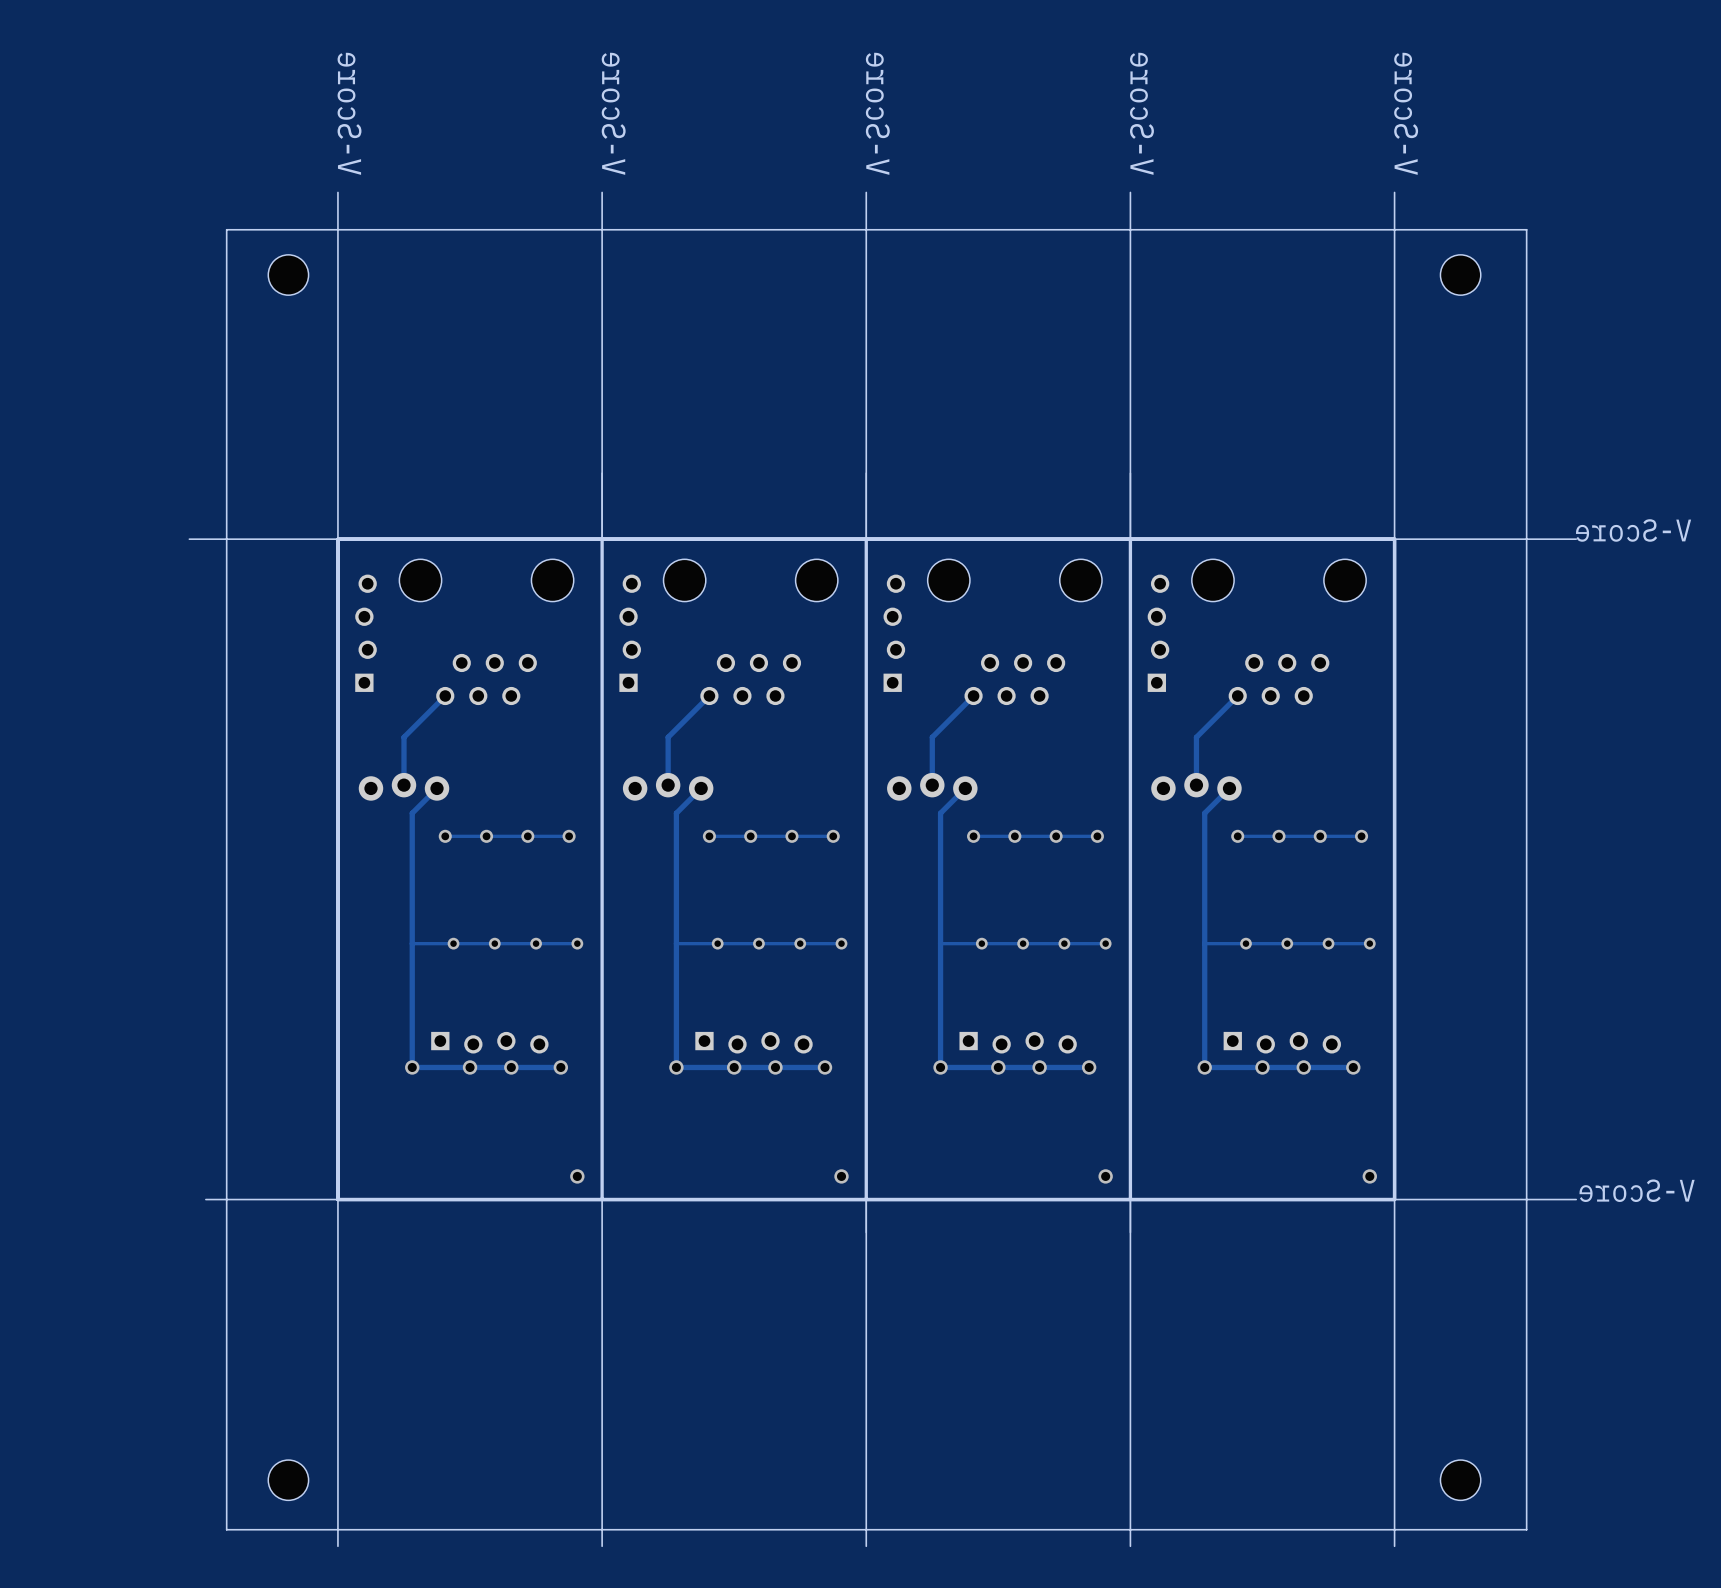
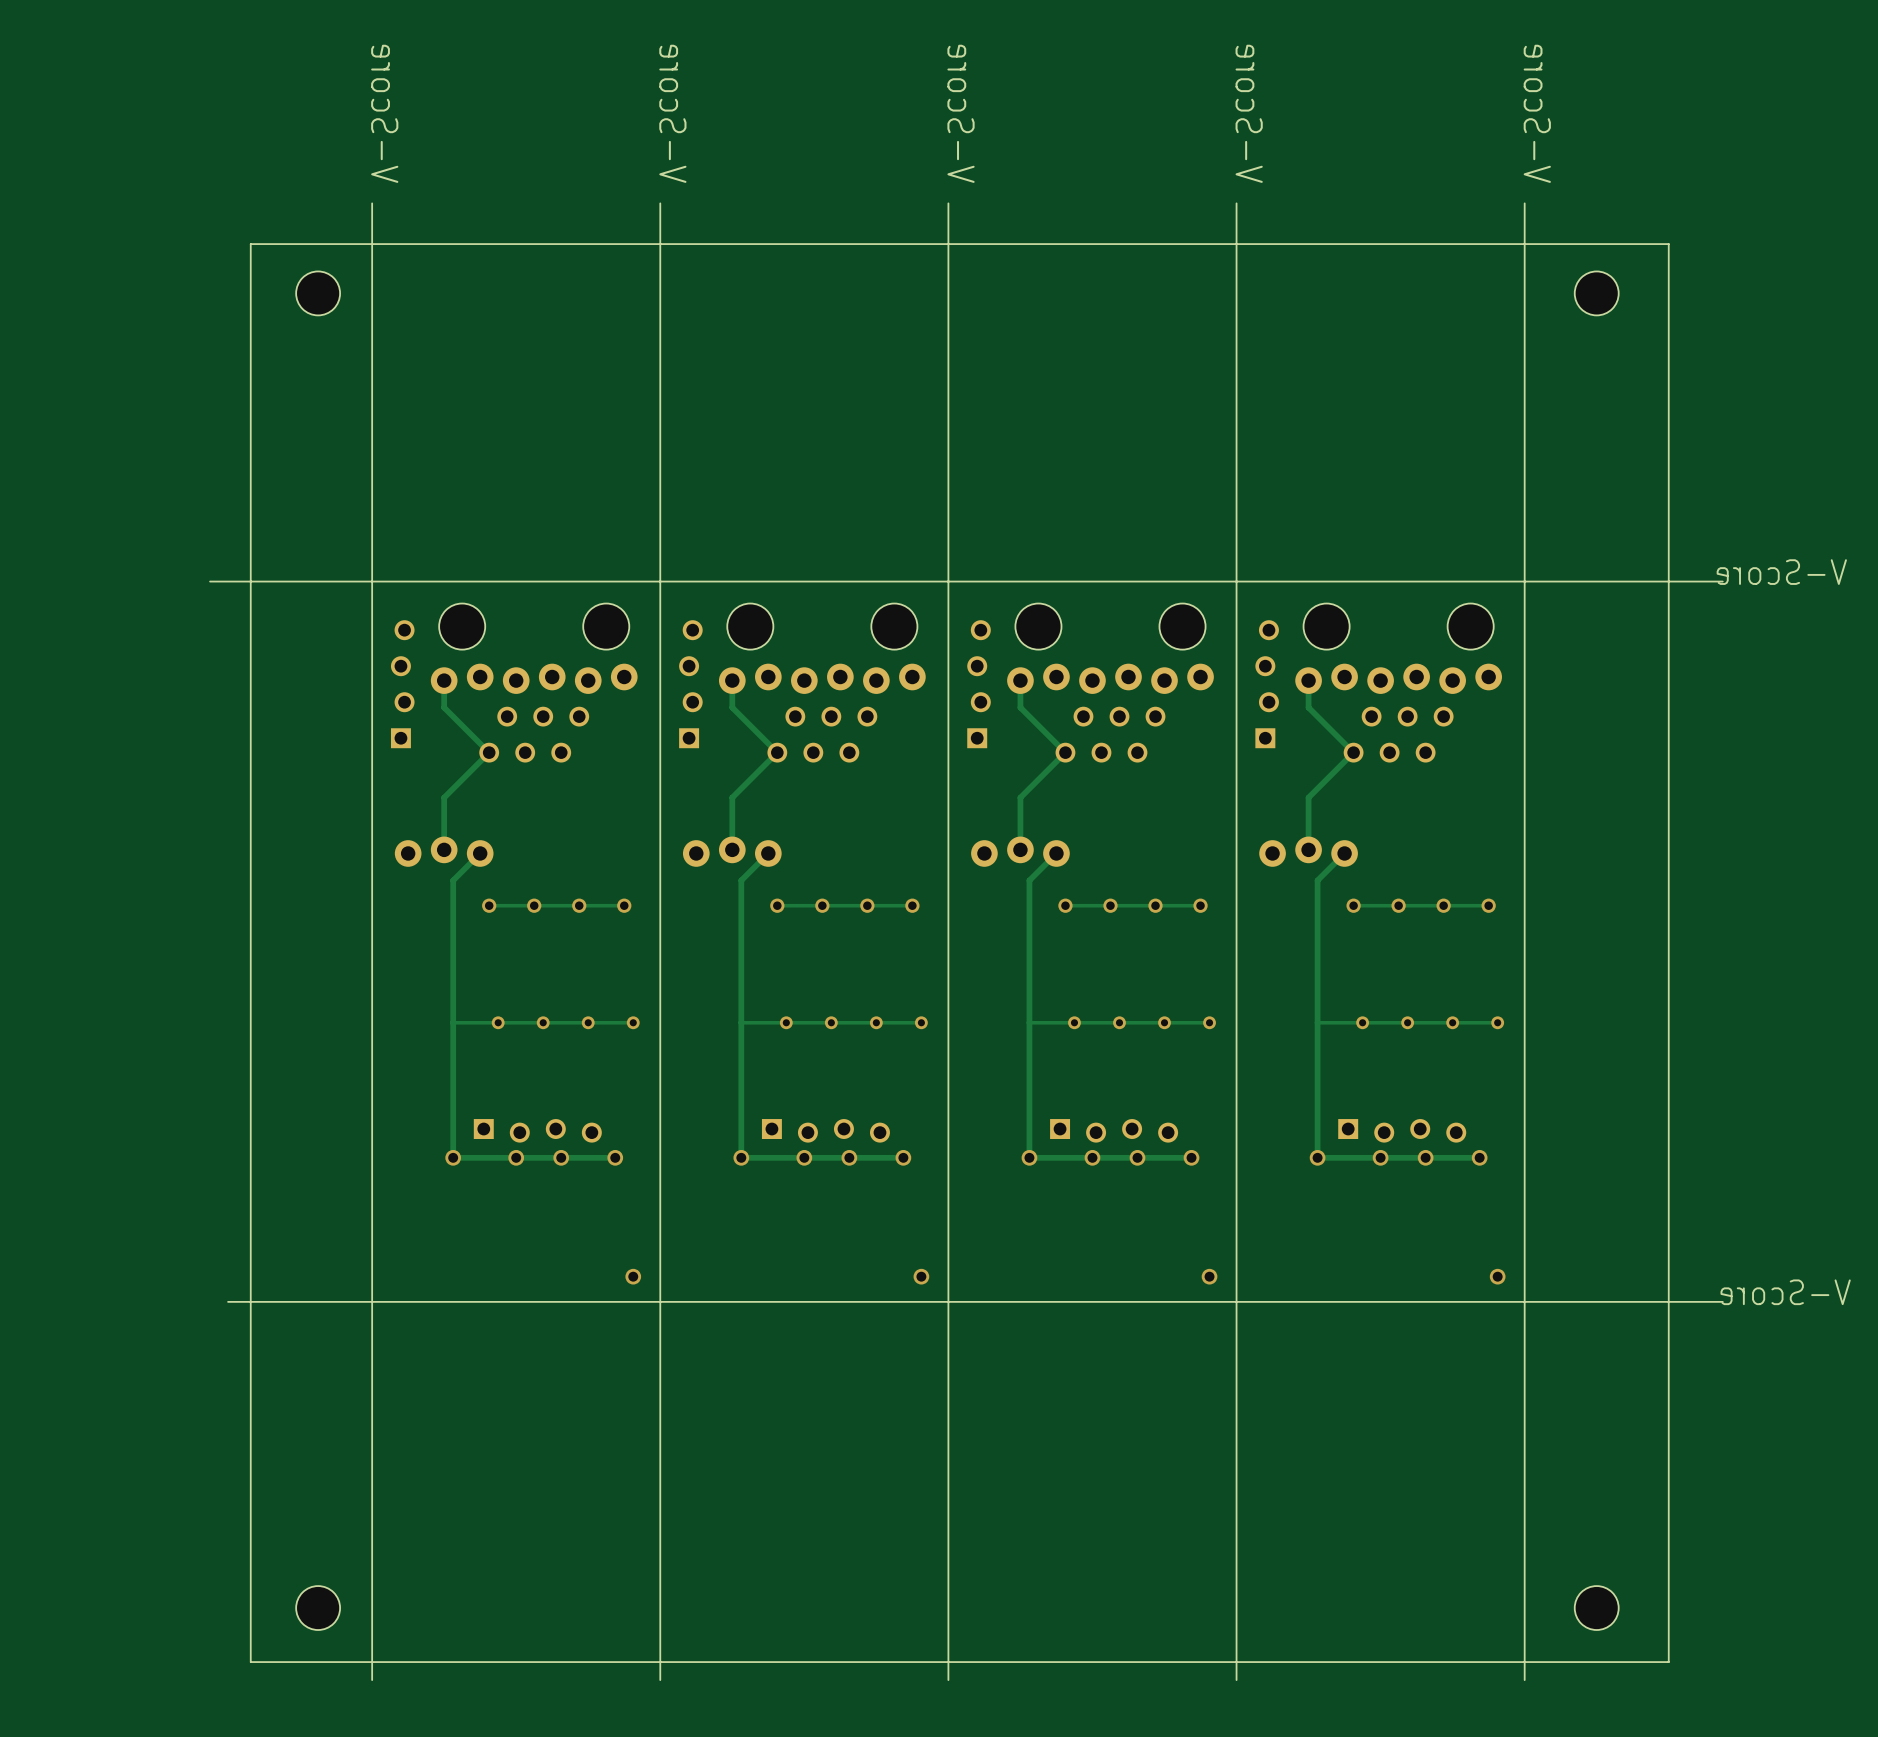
board edge: (602, 473) (602, 1199) -> none
board edge: (866, 473) (866, 1232) -> none
board edge: (1130, 473) (1130, 1232) -> none
board edge: (1394, 539) (337, 539) (337, 1199) (1394, 1199) (1394, 539) -> none
part: none -> (534, 678)
part: none -> (822, 678)
part: none -> (1110, 678)
part: none -> (1398, 678)
track: none -> (444, 680) (444, 707) (489, 752)
track: none -> (732, 680) (732, 707) (777, 752)
track: none -> (1020, 680) (1020, 707) (1065, 752)
track: none -> (1308, 680) (1308, 707) (1353, 752)

